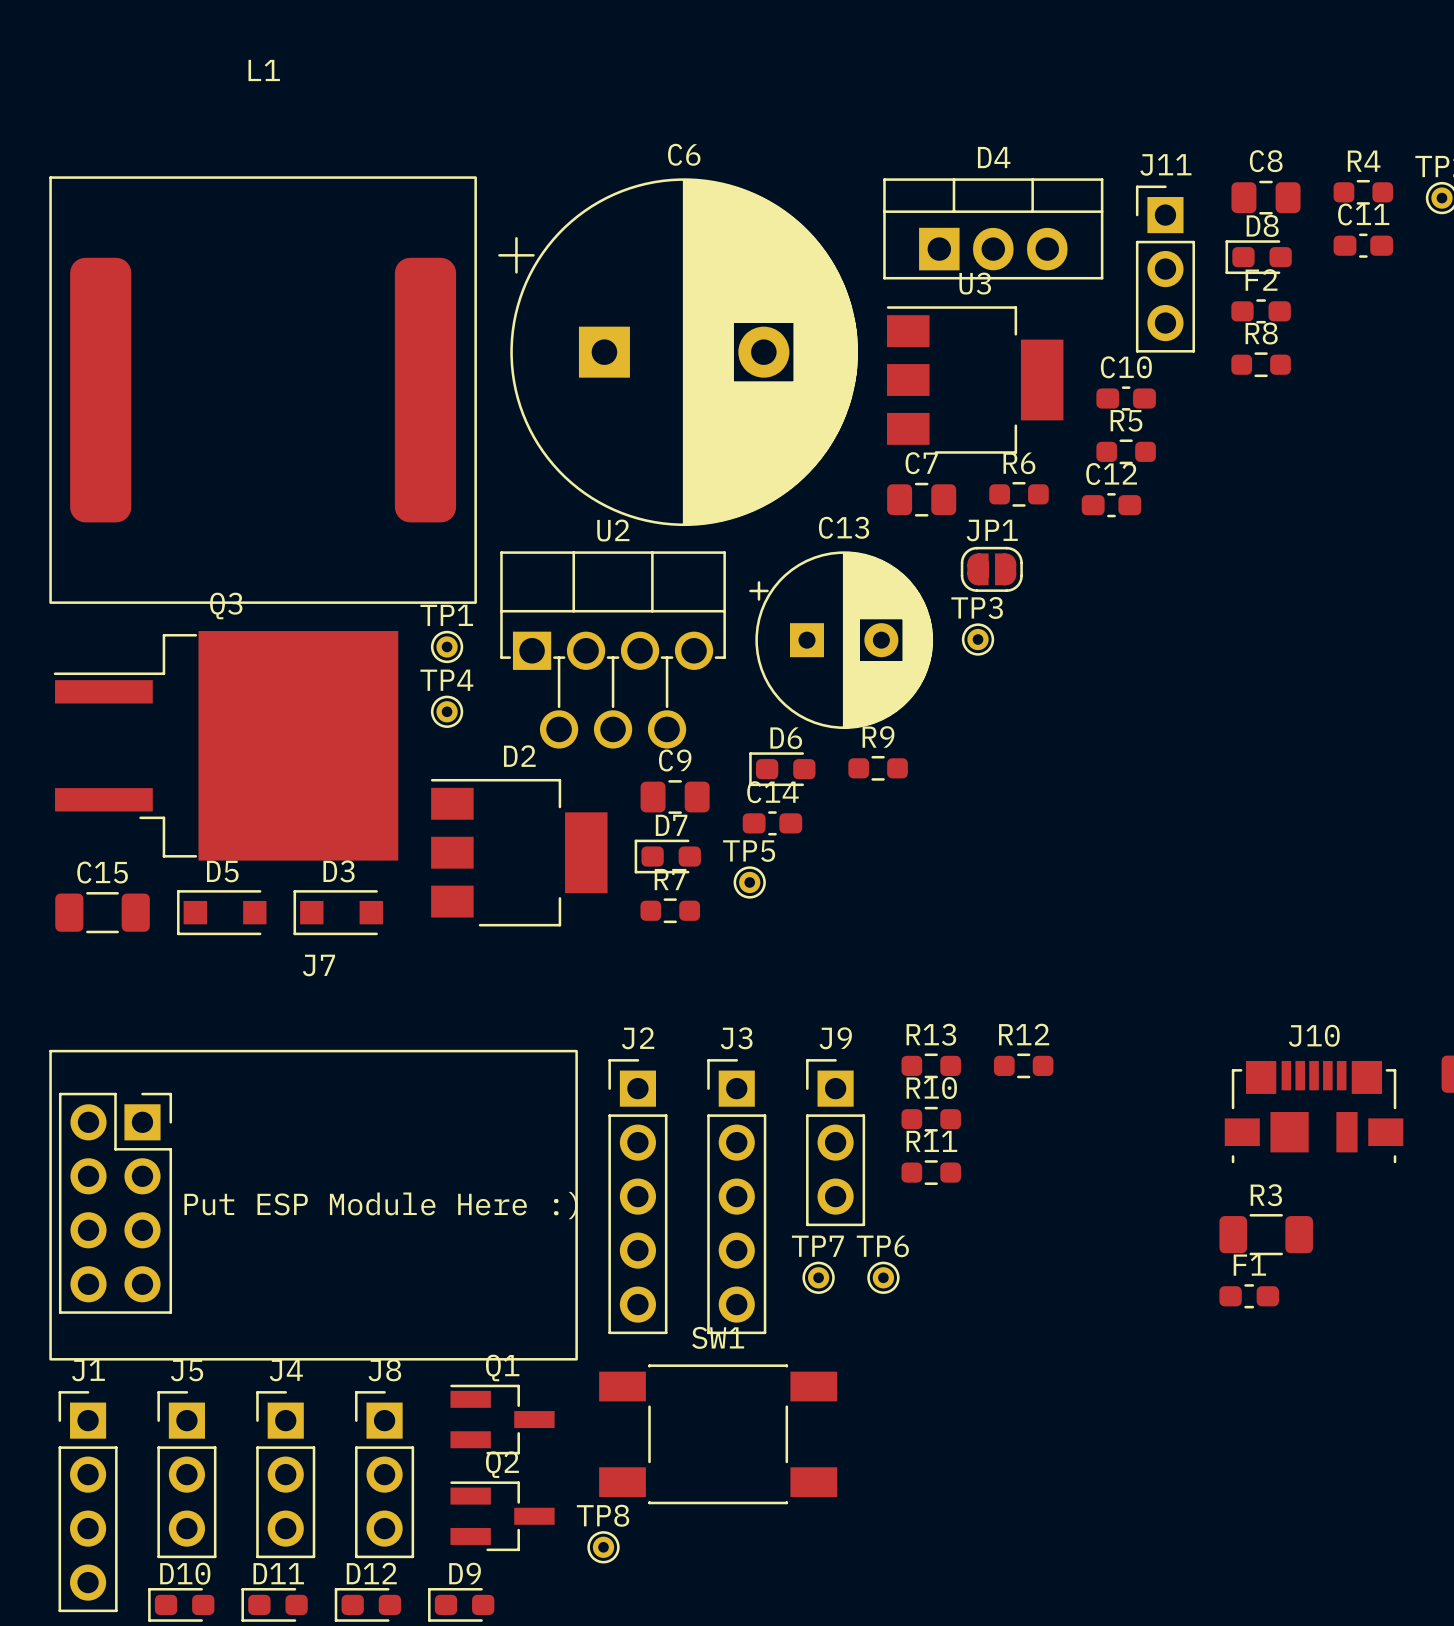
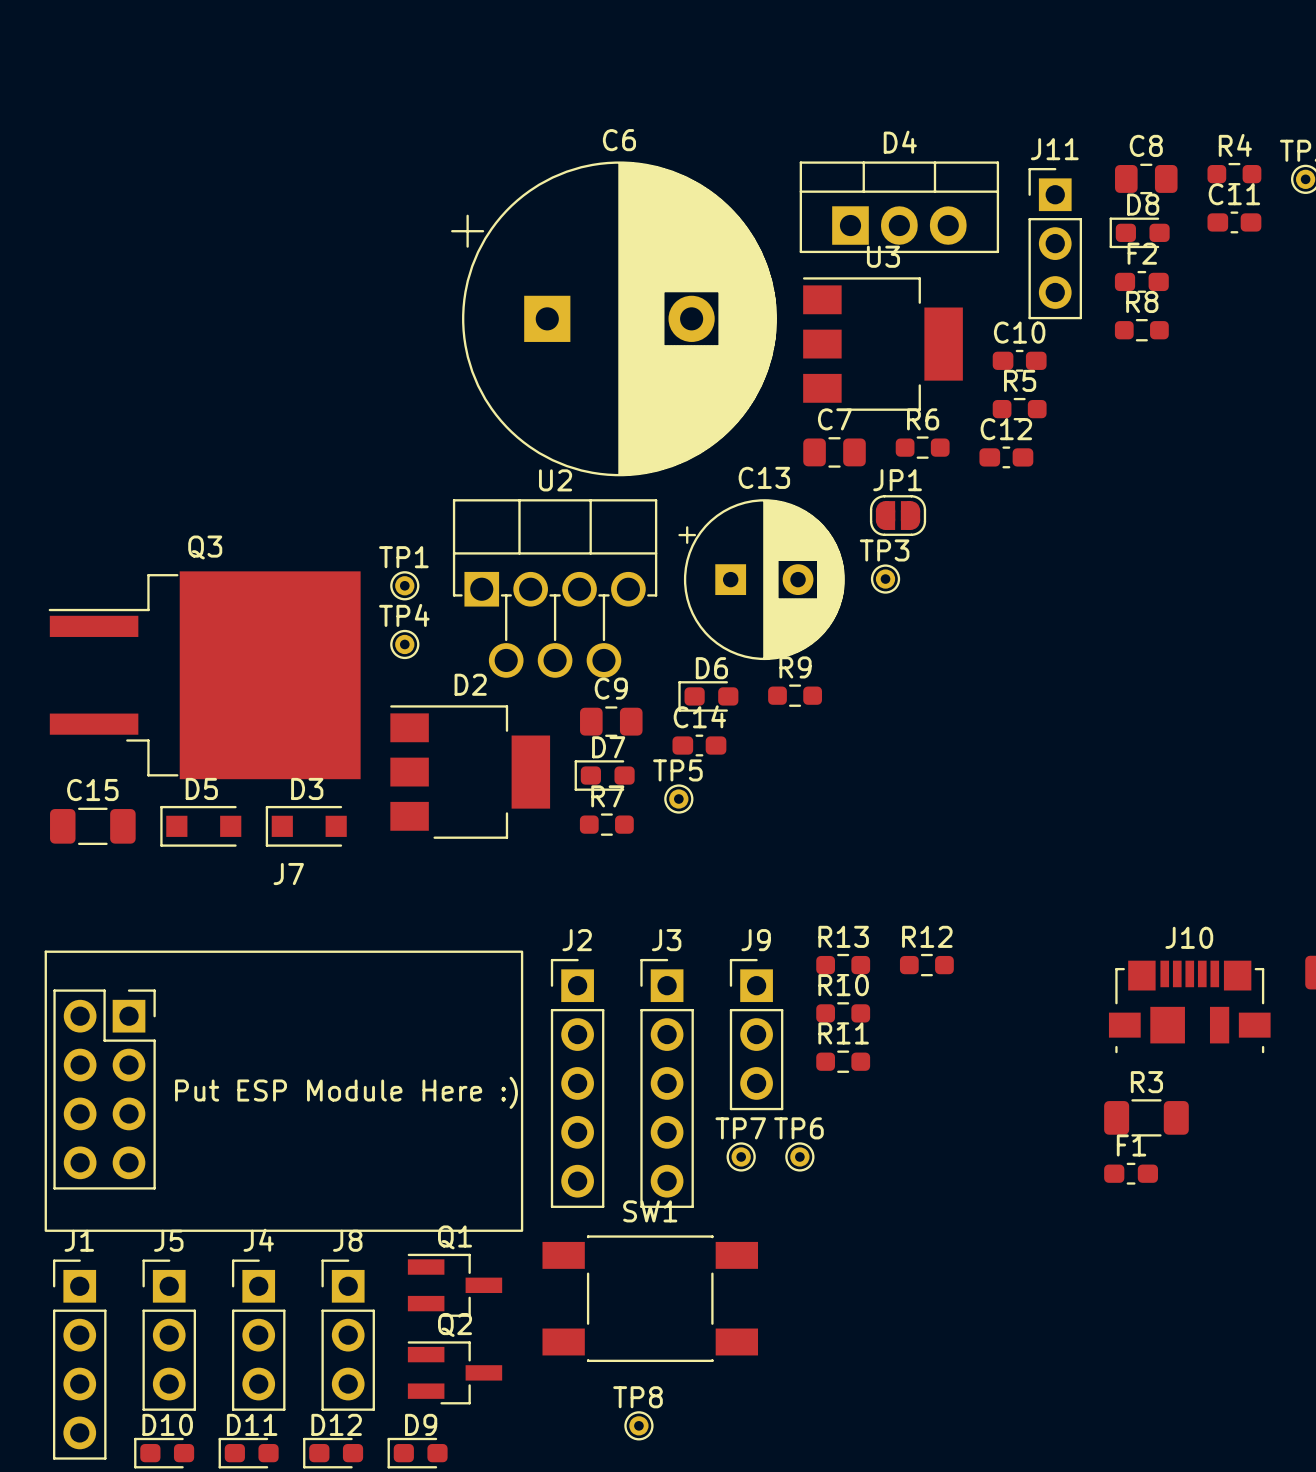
L1: (263, 390) -> none
TP8 position: (603, 1547) -> (638, 1425)

